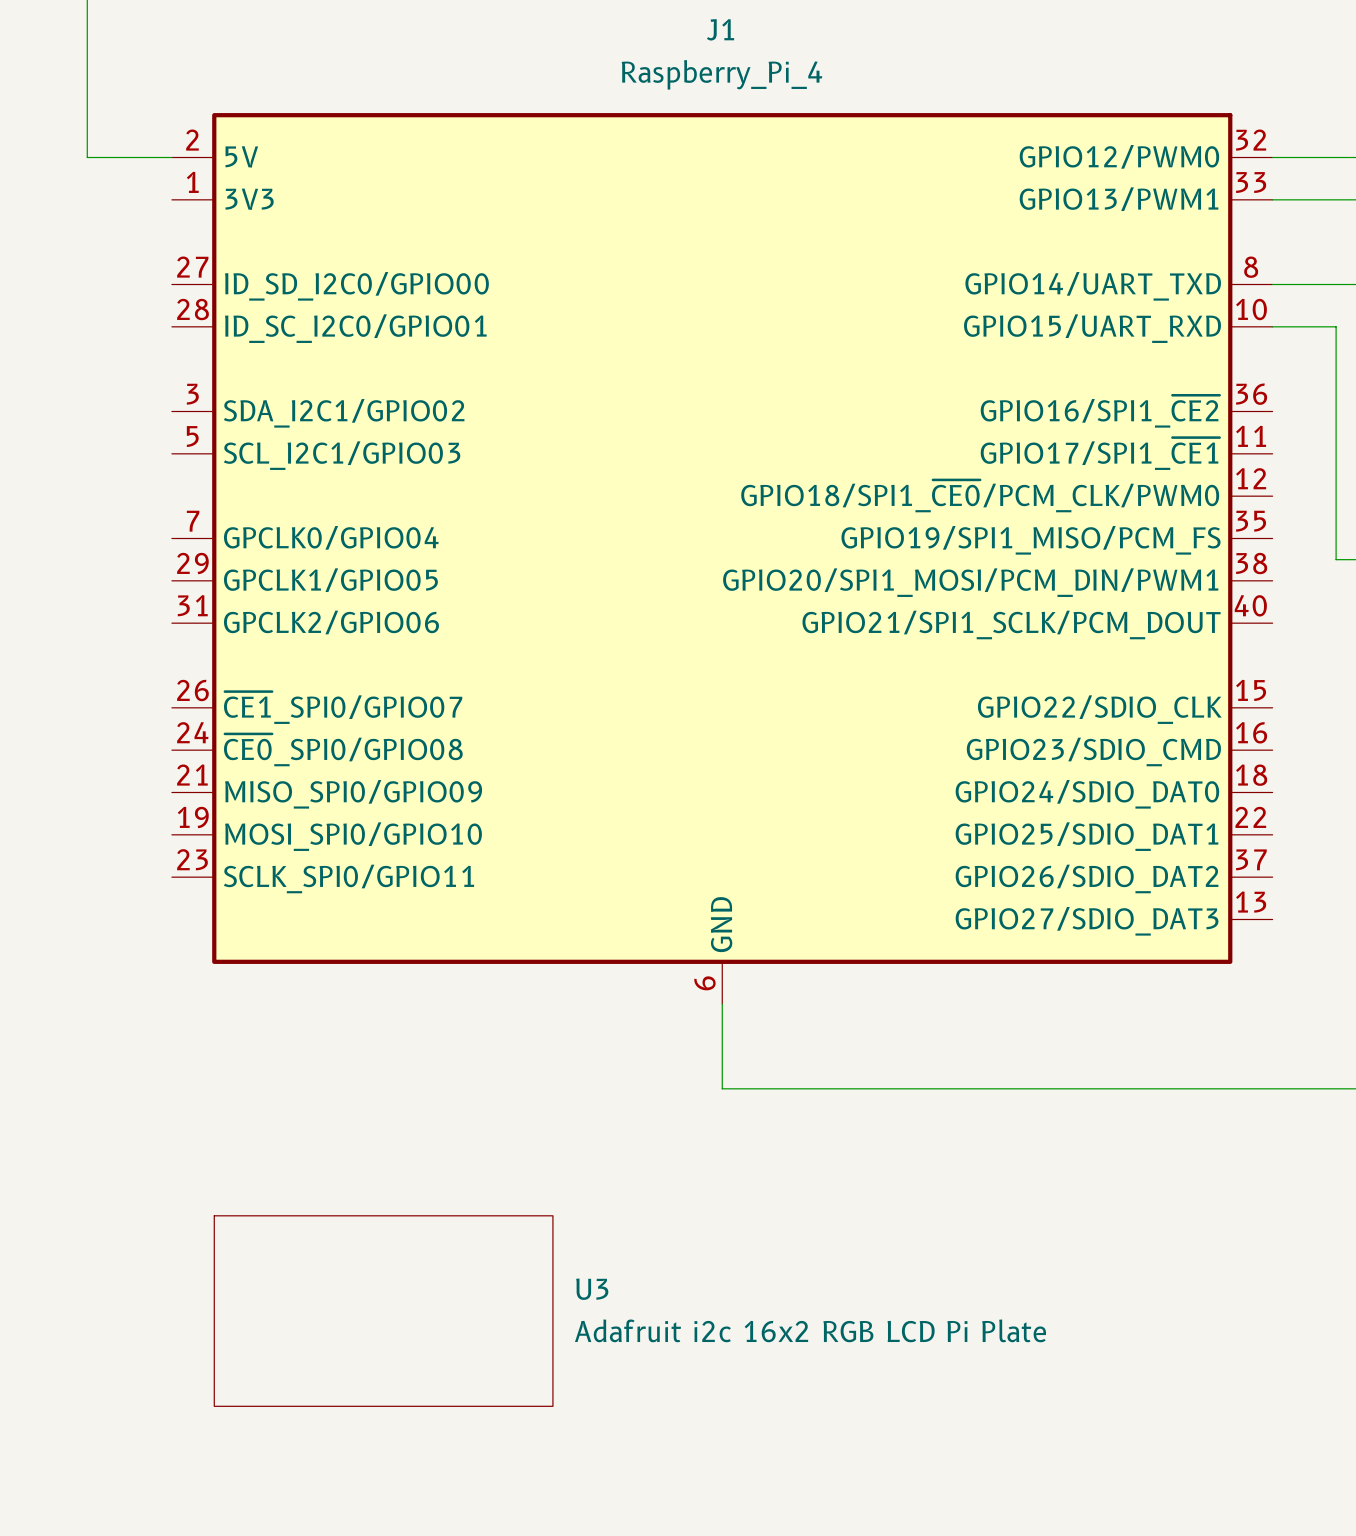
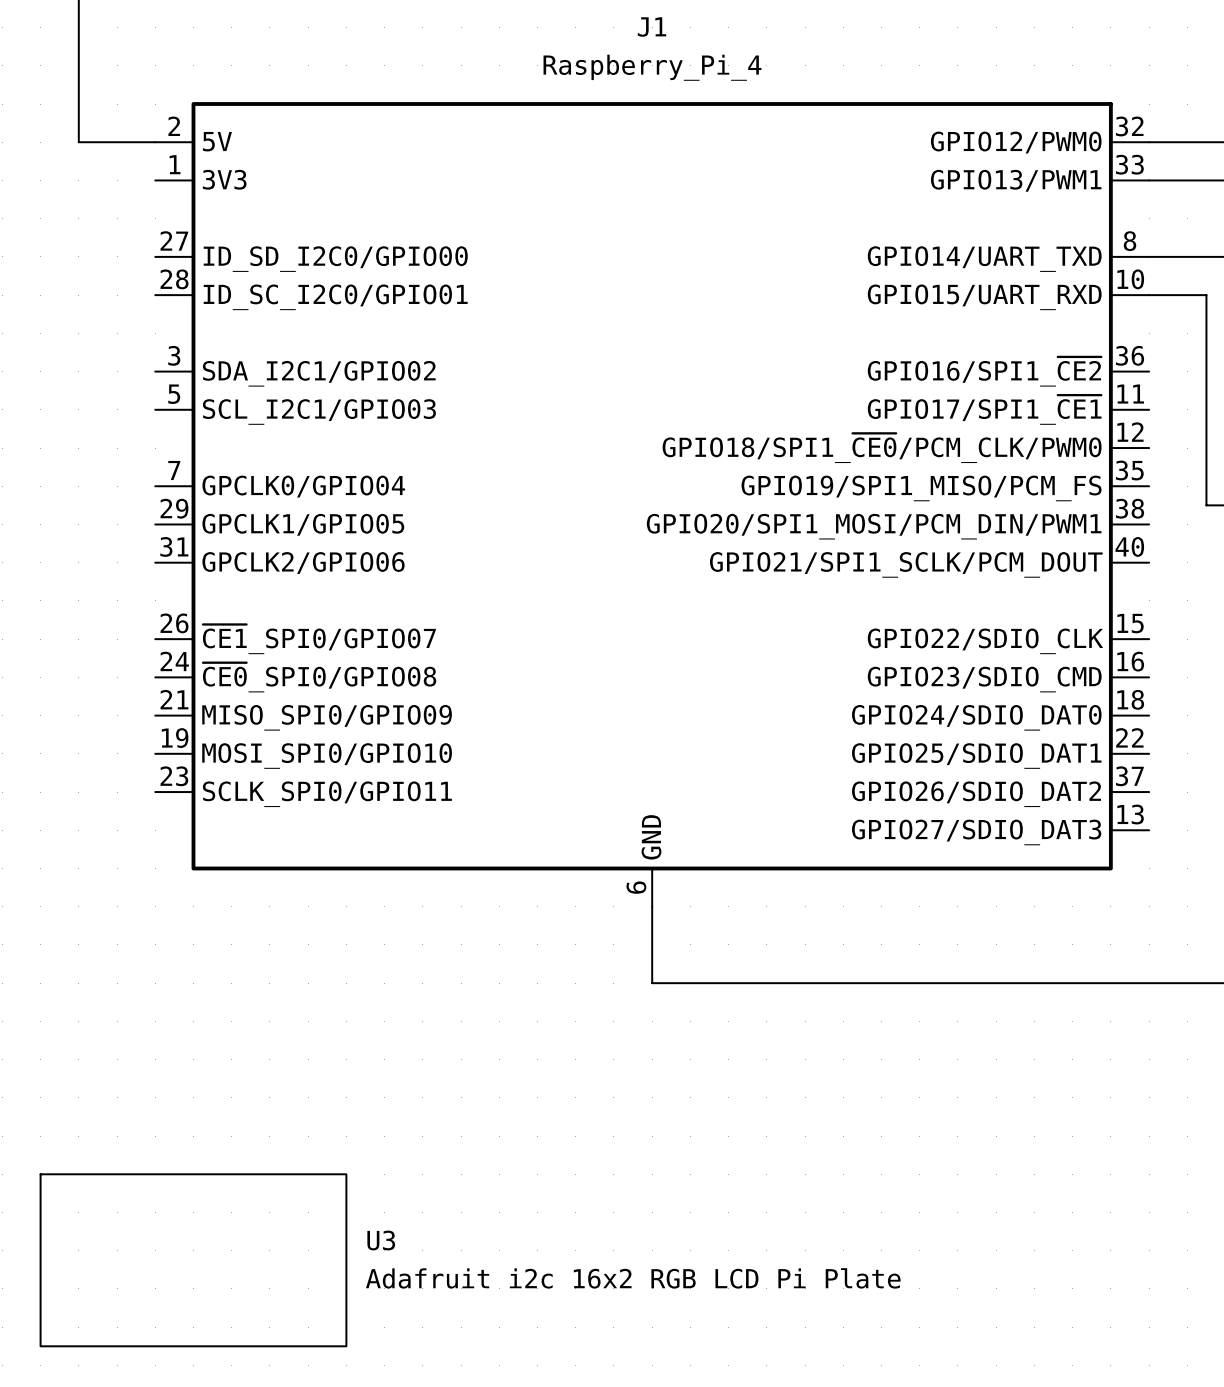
U3 position: (383, 1311) -> (193, 1260)

